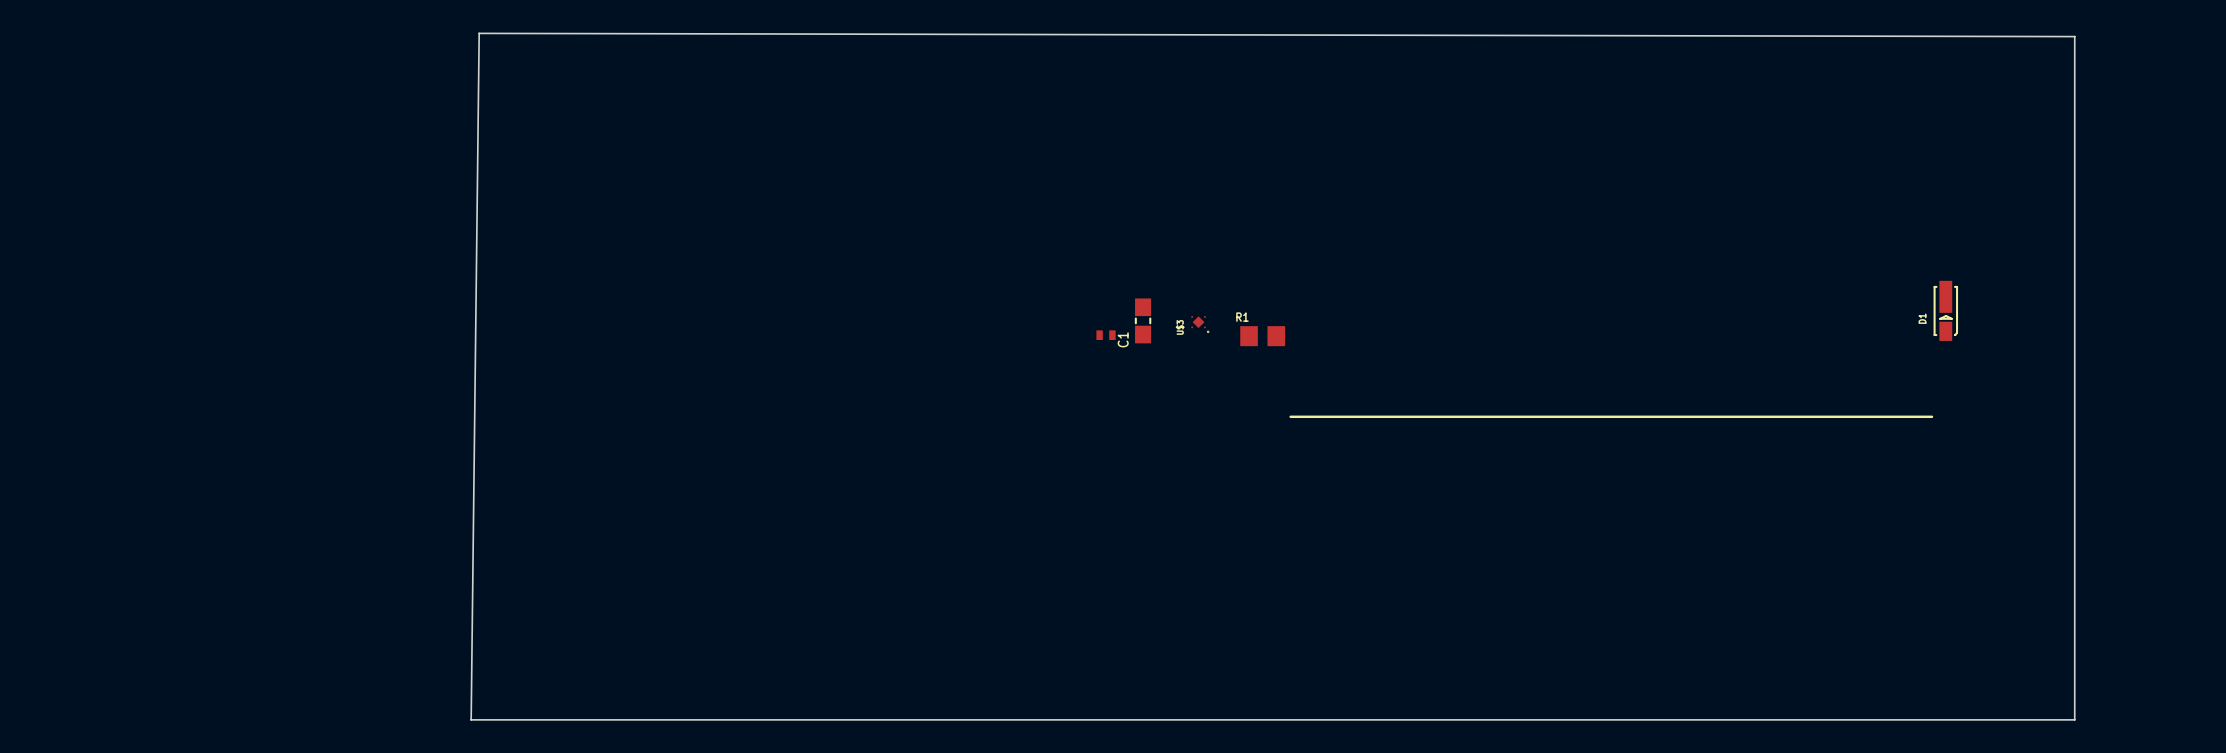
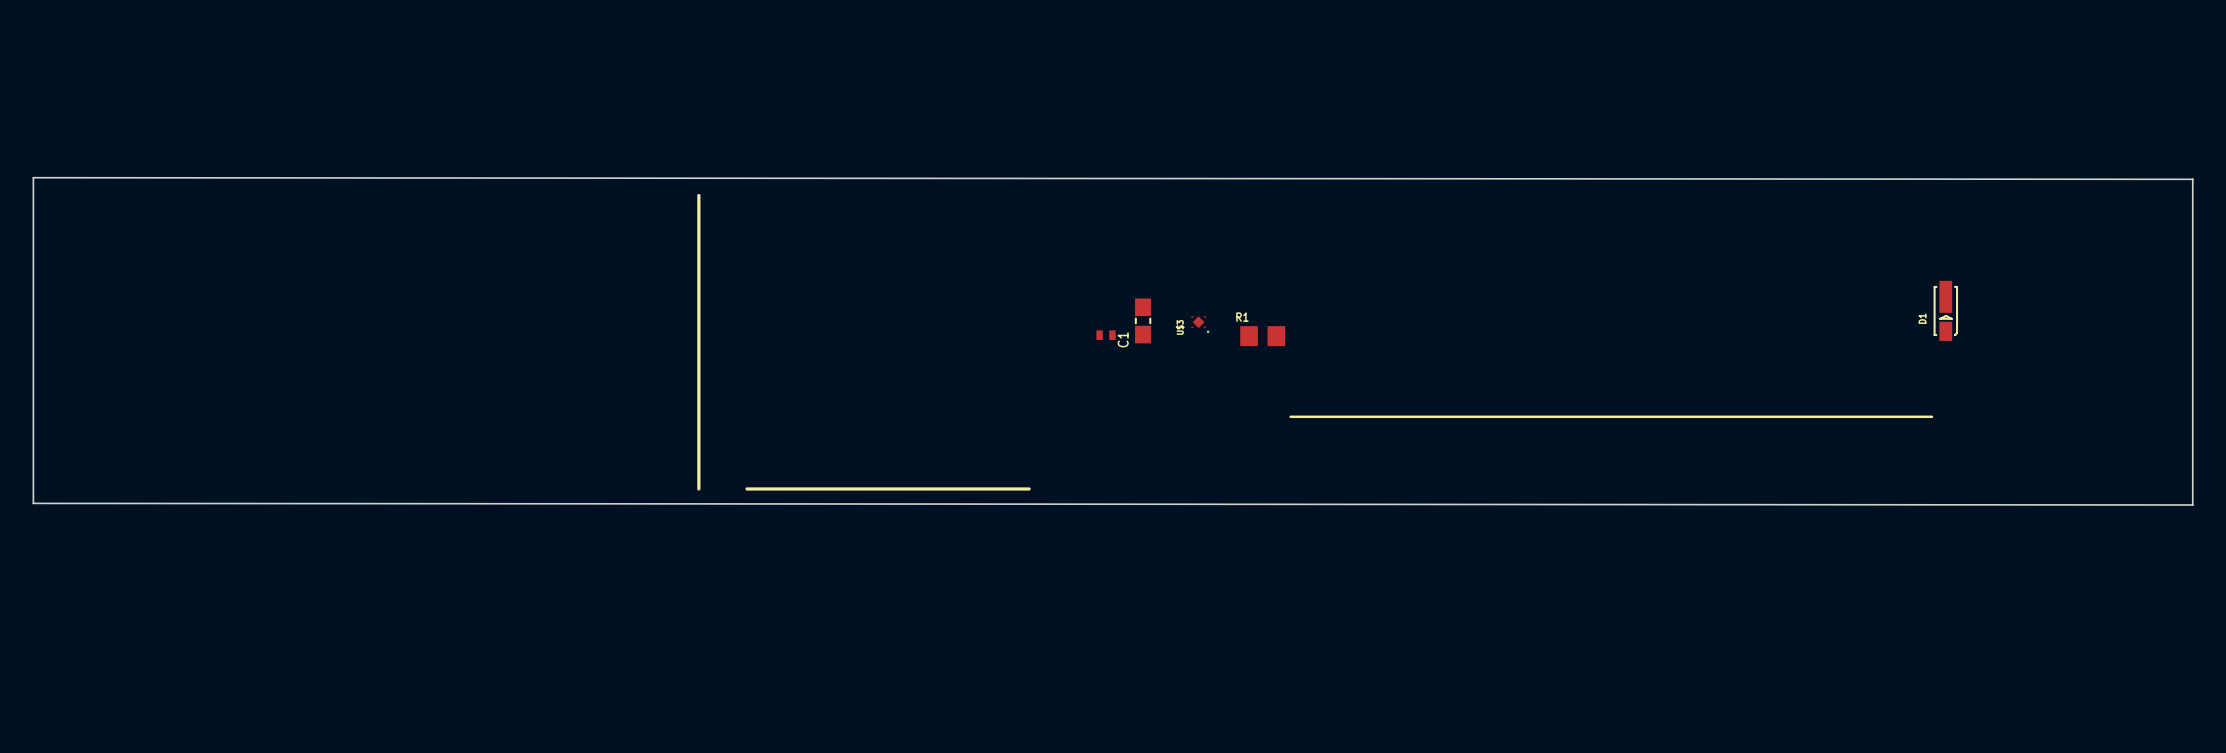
board edge: (479, 33) (2074, 36) (2074, 719) (471, 719) (479, 33) -> none
board edge: none -> (33, 177) (2192, 179) (2192, 505) (33, 503) (33, 177)
line: none -> (698, 195) (698, 488)
line: none -> (746, 488) (1029, 488)

